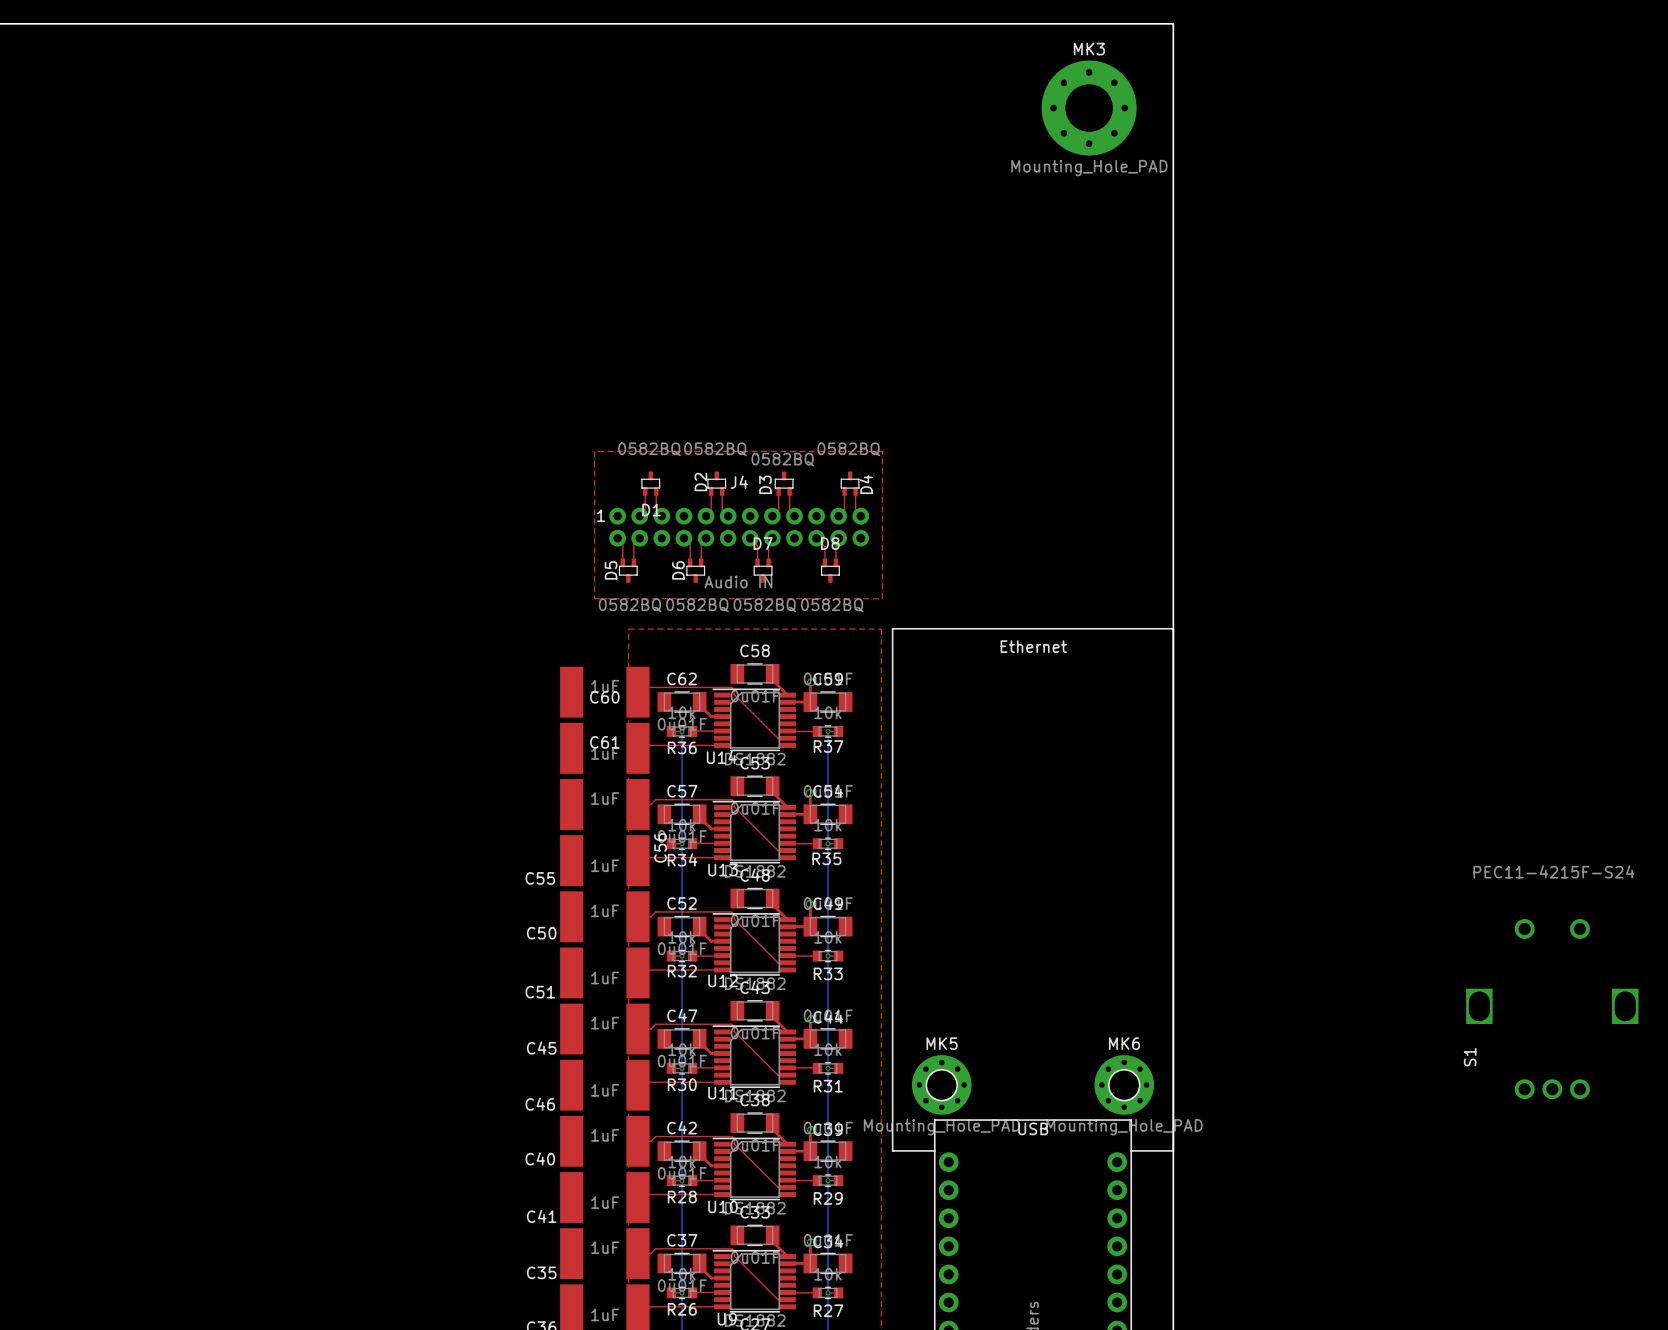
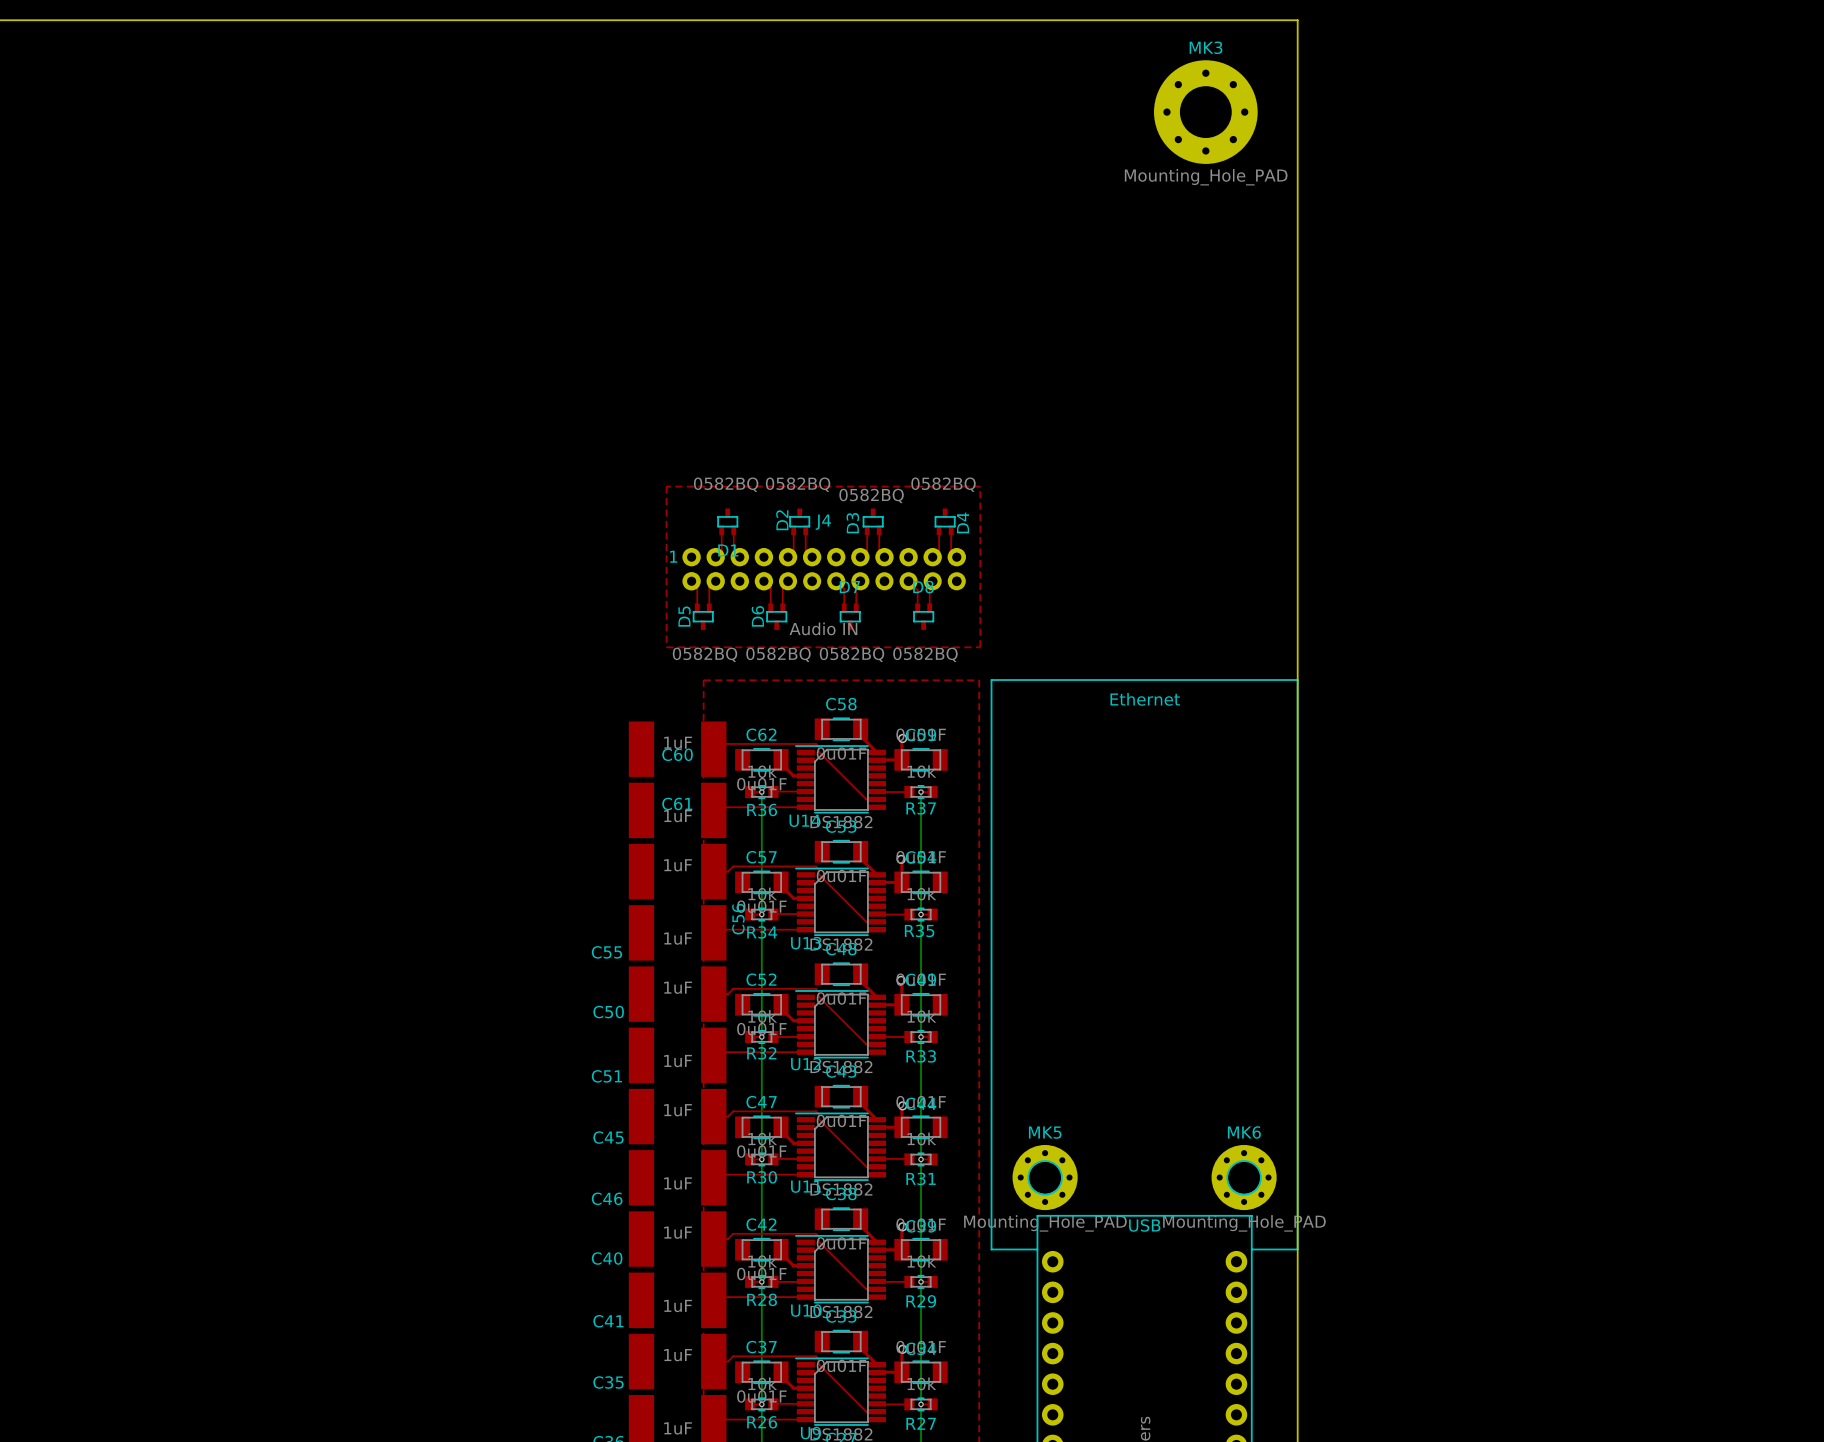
S1: PEC11-4215F-S24 (1552, 1009) -> none

